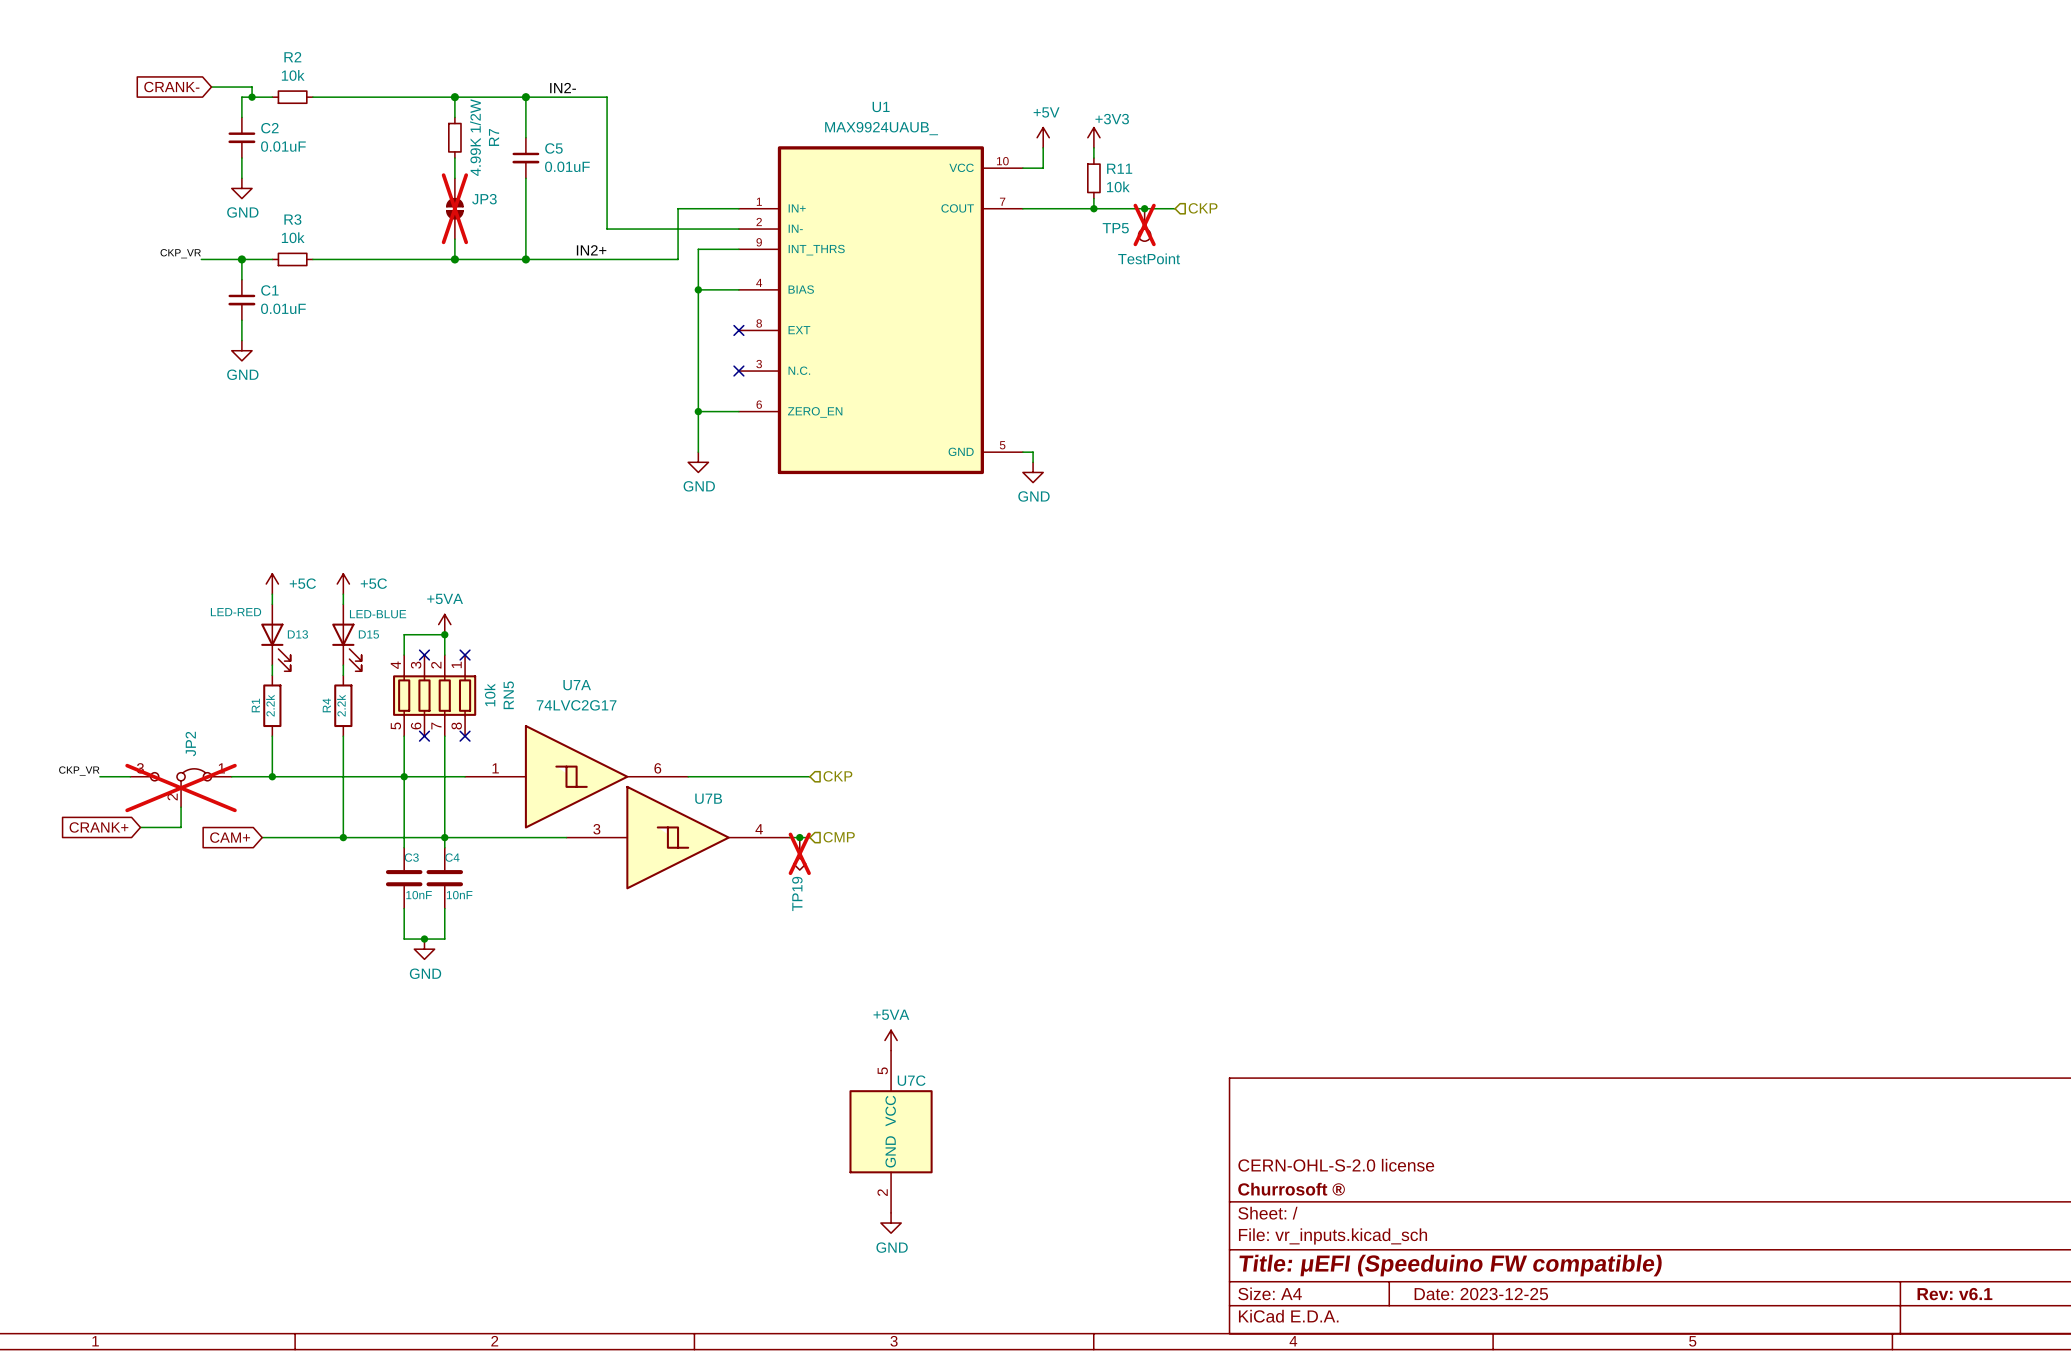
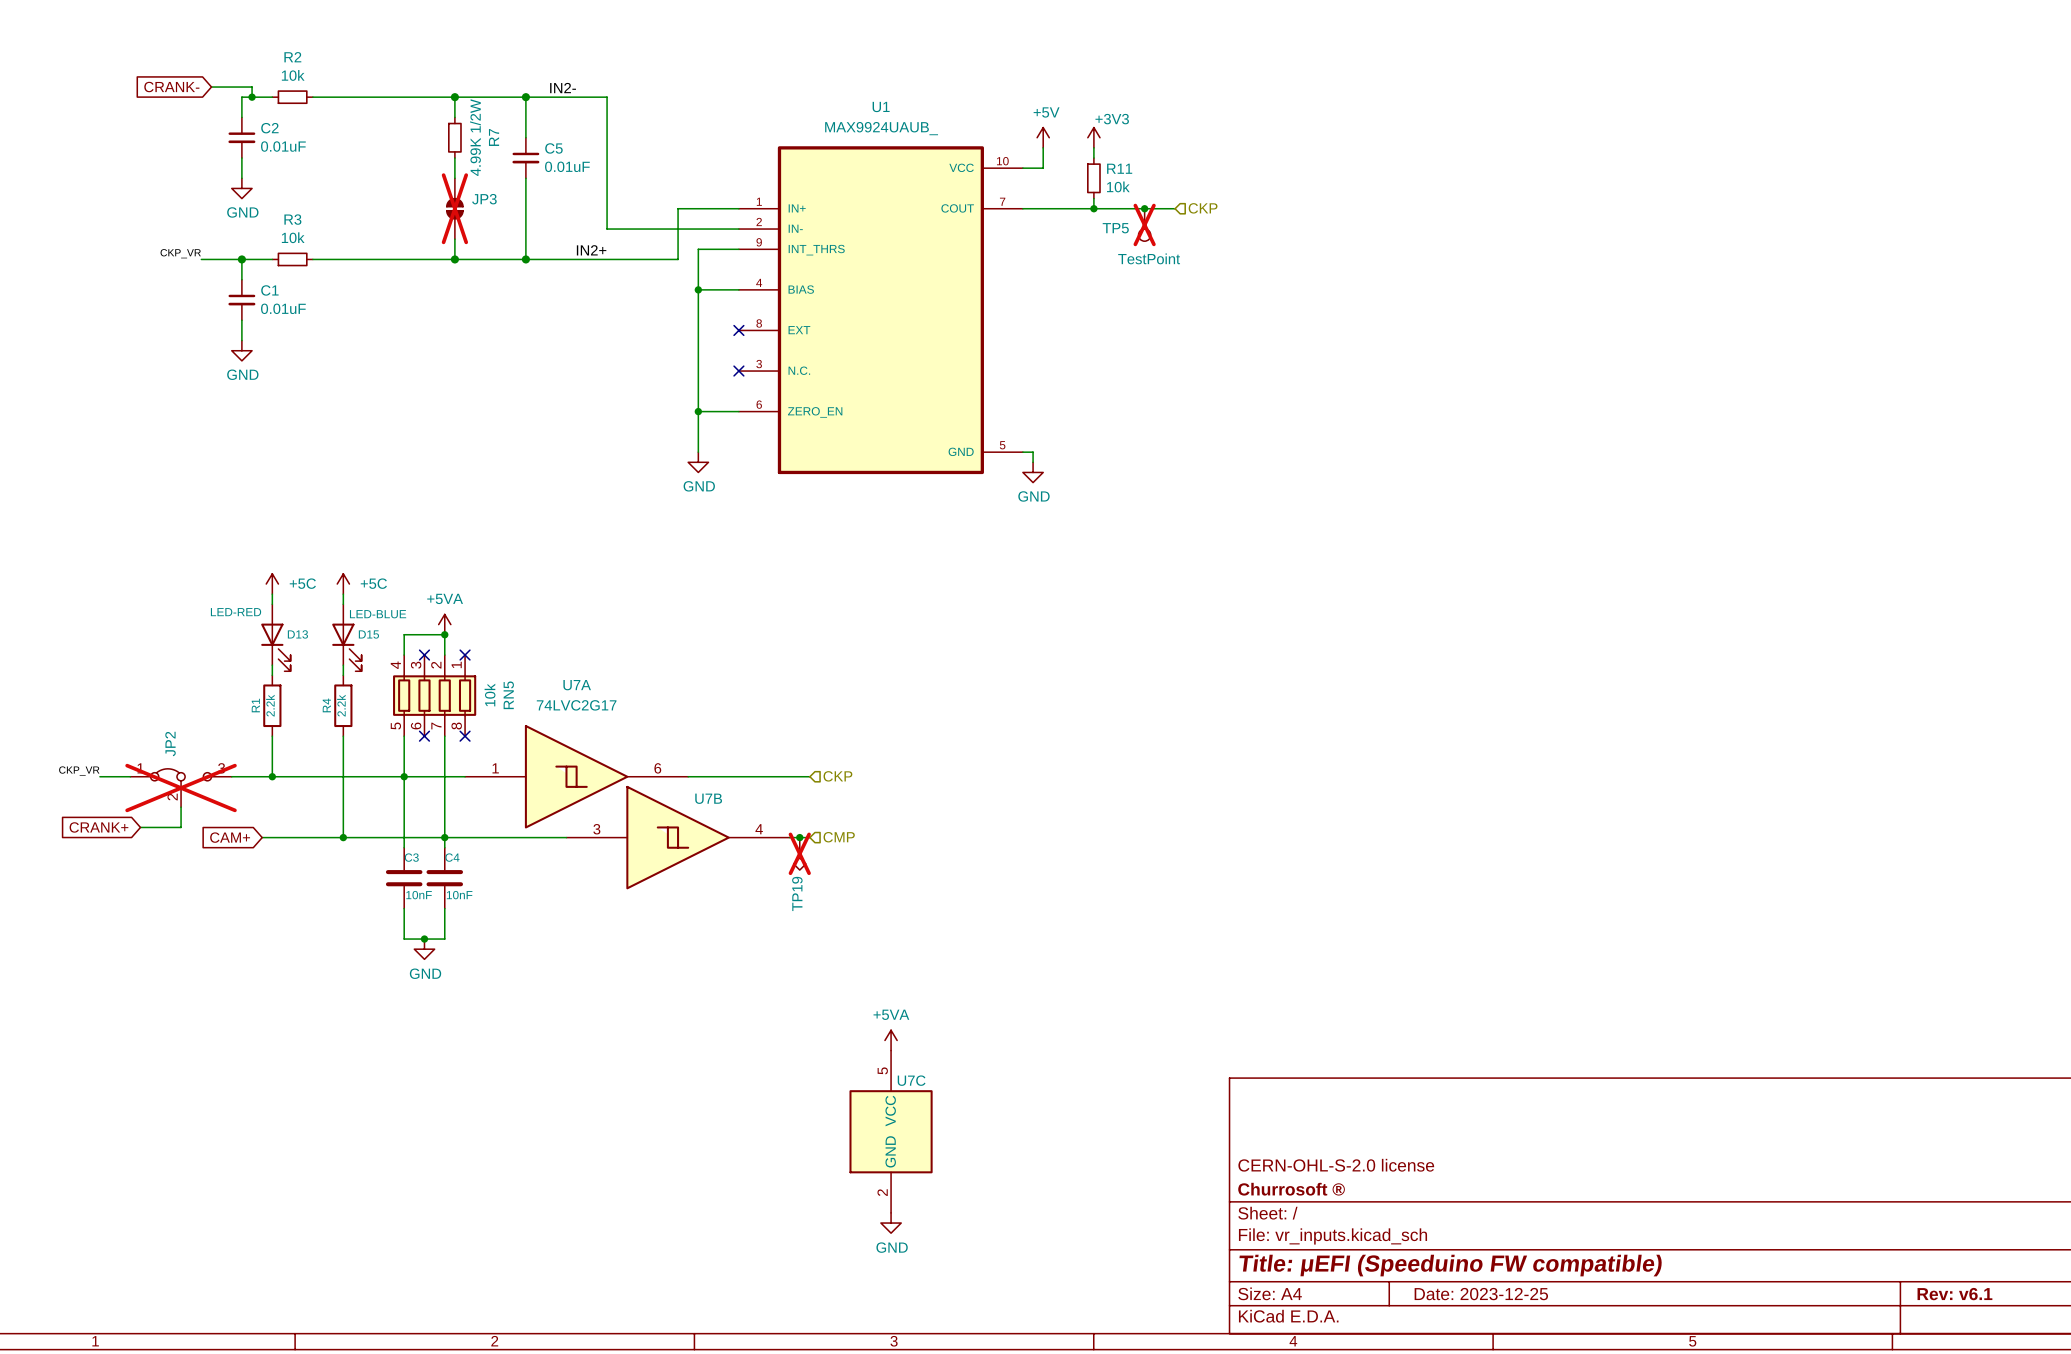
JP2 flip: as is (181, 777) -> left-right (181, 777)

